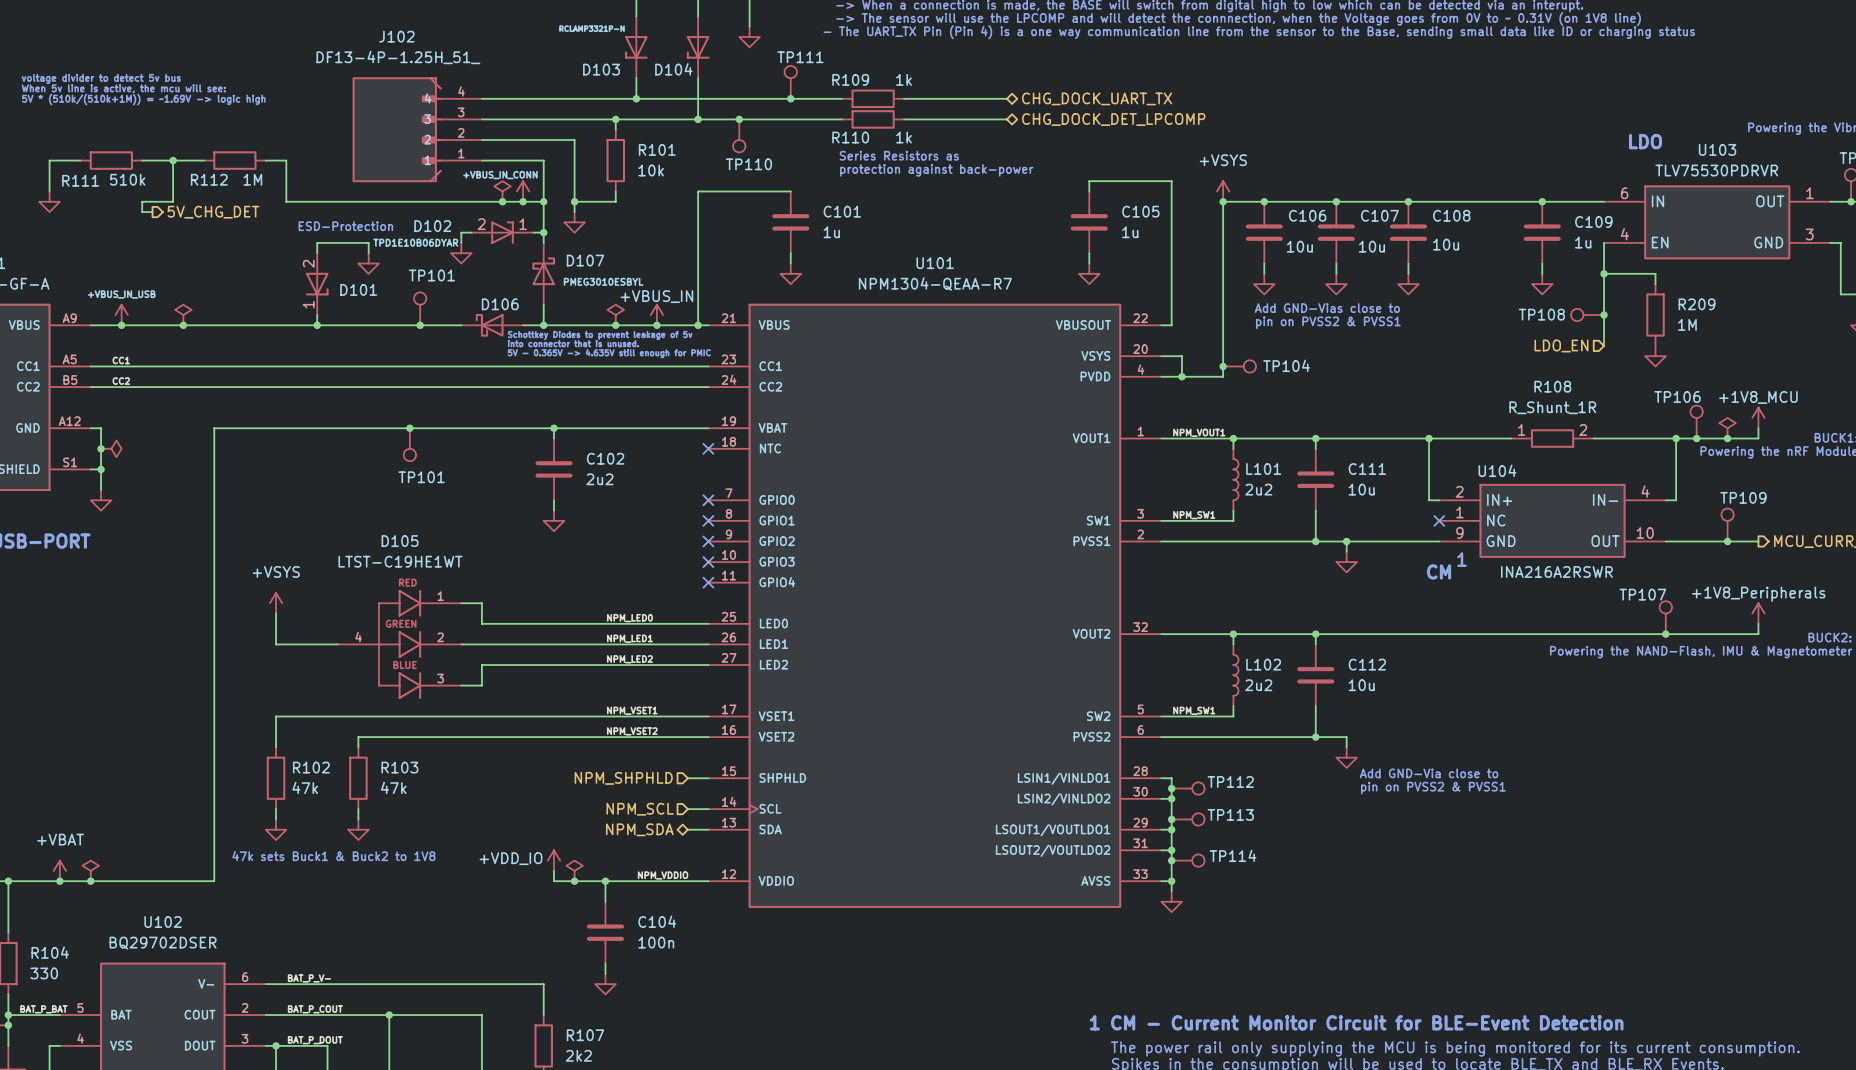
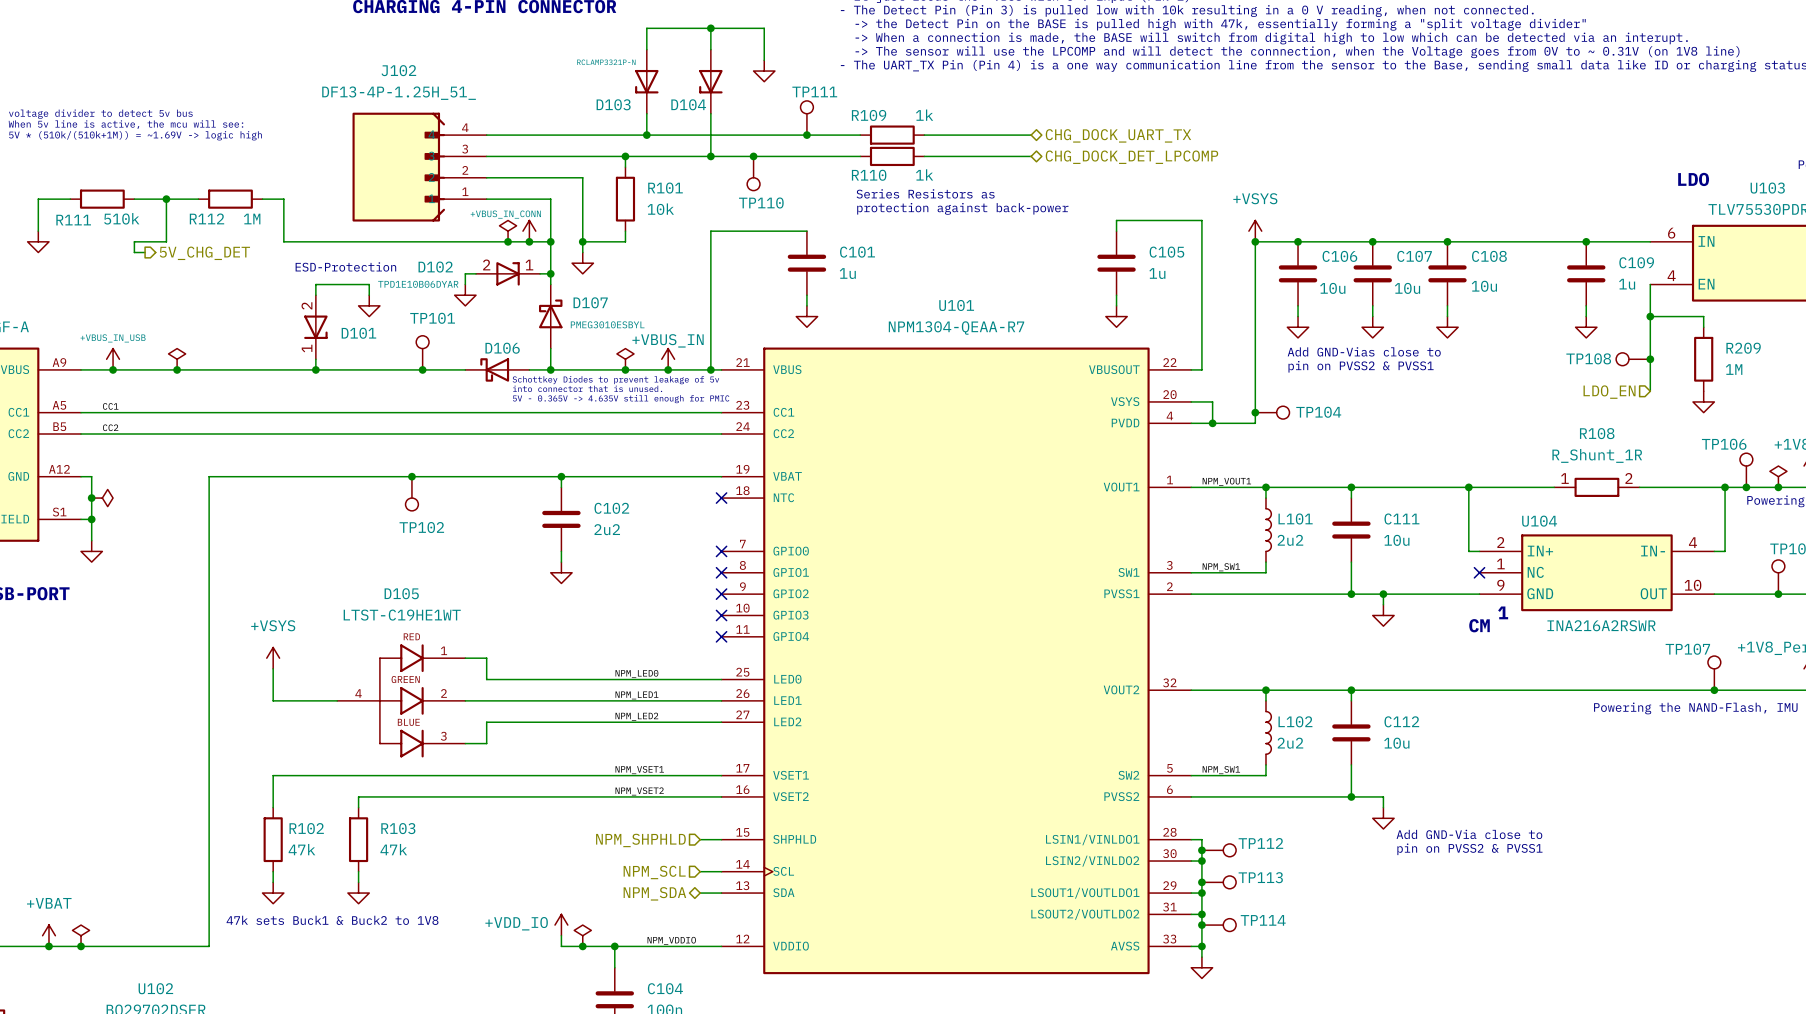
TP101 name: TP101 (421, 477) -> TP102 (421, 527)

